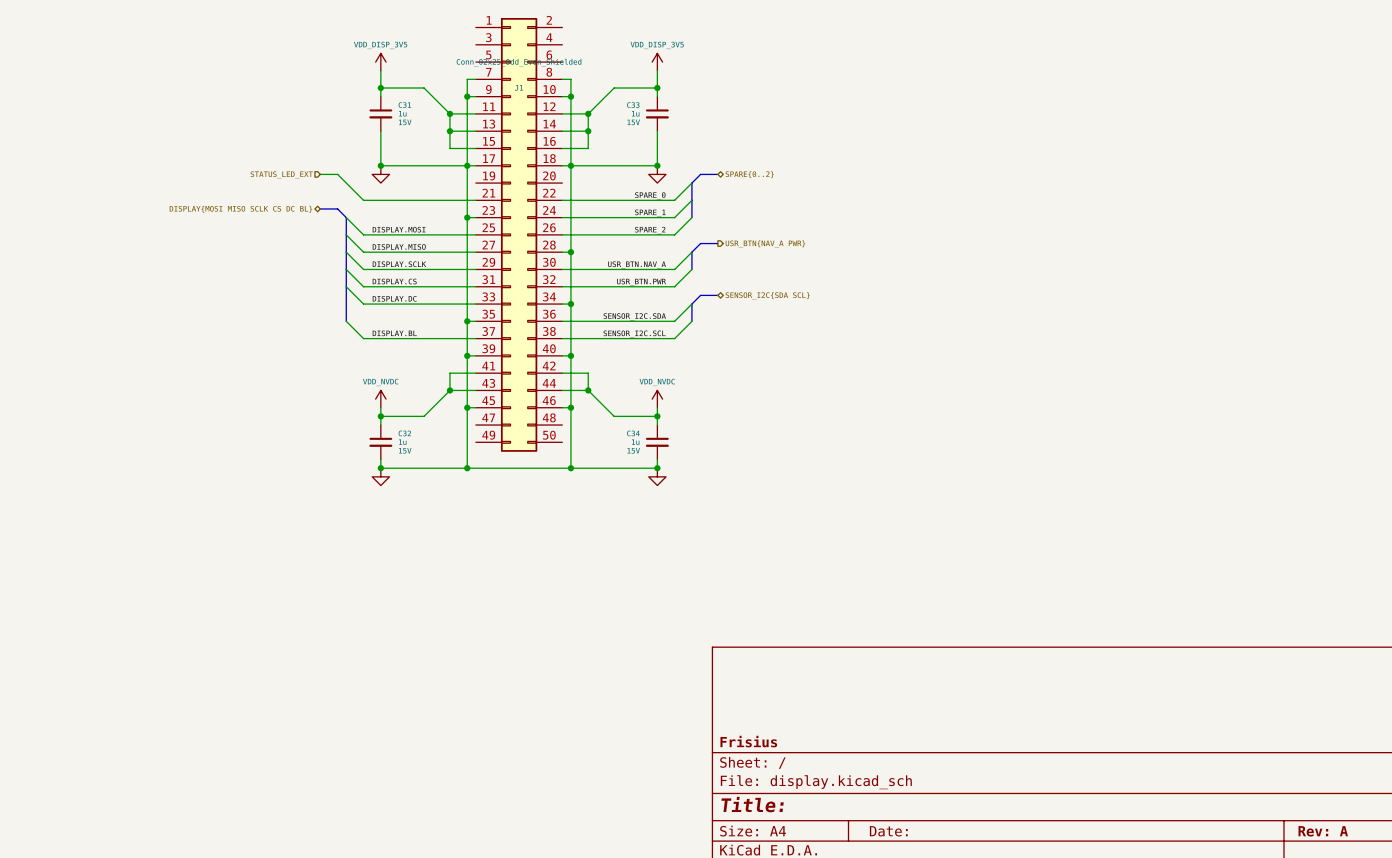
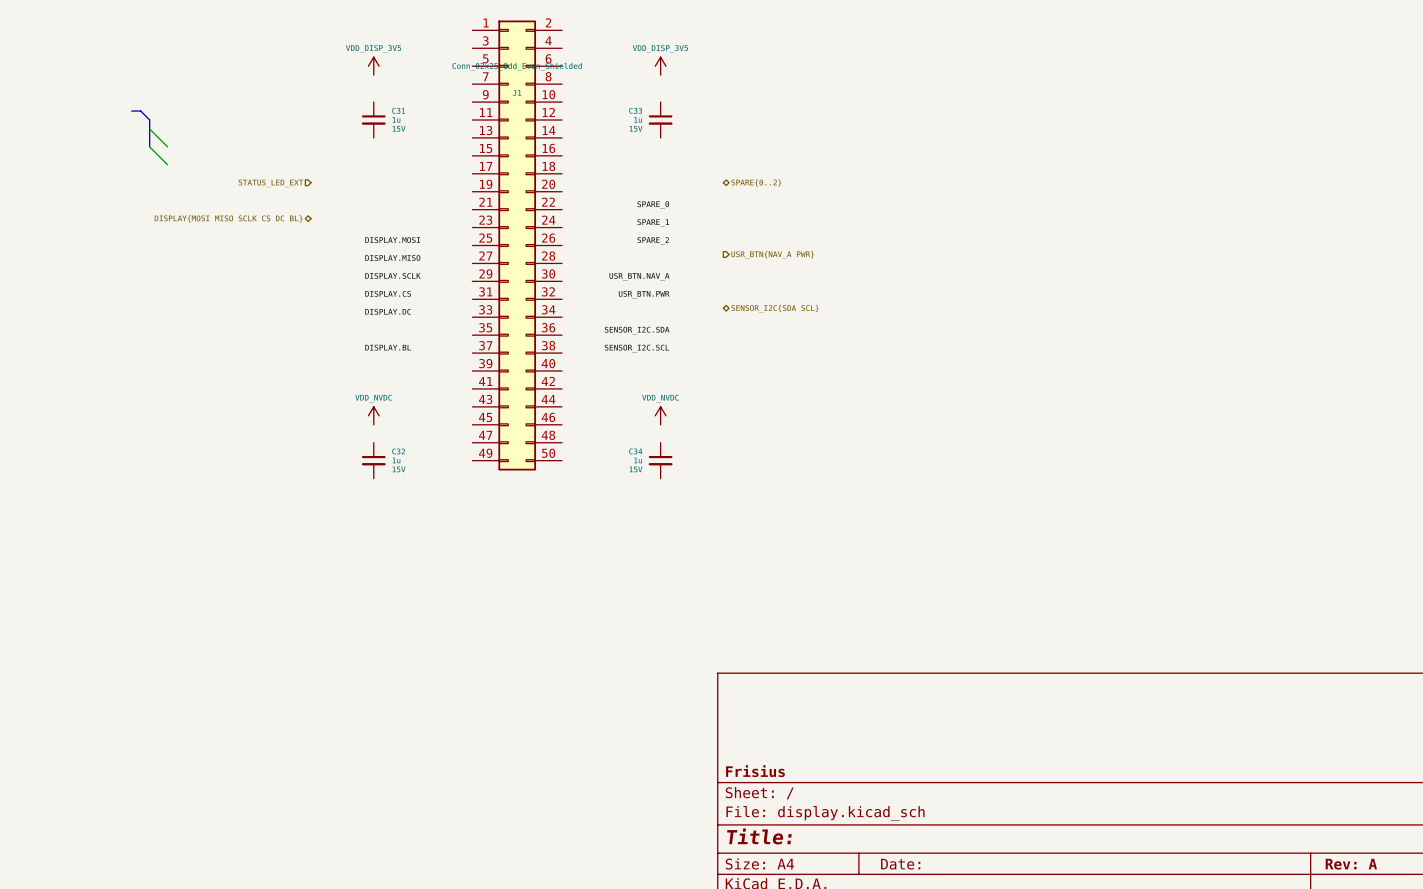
wire: (380, 70) (380, 96) -> none
wire: (657, 70) (657, 96) -> none
wire: (475, 79) (467, 79) (467, 468) -> none
wire: (562, 79) (570, 79) (570, 468) -> none
wire: (380, 88) (424, 88) (449, 113) -> none
junction: (380, 88) -> none
wire: (657, 88) (614, 88) (588, 113) -> none
junction: (657, 88) -> none
wire: (467, 96) (475, 96) -> none
junction: (467, 96) -> none
wire: (562, 96) (570, 96) -> none
junction: (570, 96) -> none
bus: none -> (131, 111) (140, 111) (149, 120) (149, 146)
wire: (449, 113) (449, 148) (475, 148) -> none
wire: (449, 113) (475, 113) -> none
junction: (449, 113) -> none
wire: (562, 113) (588, 113) -> none
wire: (588, 113) (588, 148) (562, 148) -> none
junction: (588, 113) -> none
wire: none -> (149, 128) (167, 146)
wire: (380, 131) (380, 165) (475, 165) -> none
wire: (449, 131) (475, 131) -> none
junction: (449, 131) -> none
wire: (562, 131) (588, 131) -> none
junction: (588, 131) -> none
wire: (657, 131) (657, 165) (562, 165) -> none
wire: none -> (149, 146) (167, 164)
junction: (380, 165) -> none
junction: (467, 165) -> none
junction: (570, 165) -> none
junction: (657, 165) -> none
wire: (320, 174) (337, 174) (363, 200) (475, 200) -> none
power symbol: (380, 174) -> none
power symbol: (657, 174) -> none
bus: (717, 174) (700, 174) (691, 183) (691, 217) -> none
wire: (691, 183) (674, 200) (562, 200) -> none
wire: (691, 200) (674, 217) (562, 217) -> none
bus: (320, 208) (337, 208) (346, 217) (346, 321) -> none
wire: (346, 217) (363, 234) (475, 234) -> none
wire: (467, 217) (475, 217) -> none
junction: (467, 217) -> none
wire: (691, 217) (674, 234) (562, 234) -> none
wire: (346, 234) (363, 252) (475, 252) -> none
bus: (717, 243) (700, 243) (691, 252) (691, 269) -> none
wire: (346, 252) (363, 269) (475, 269) -> none
wire: (562, 252) (570, 252) -> none
junction: (570, 252) -> none
wire: (691, 252) (674, 269) (562, 269) -> none
wire: (346, 269) (363, 286) (475, 286) -> none
wire: (691, 269) (674, 286) (562, 286) -> none
wire: (346, 286) (363, 304) (475, 304) -> none
bus: (717, 295) (700, 295) (691, 304) (691, 321) -> none
wire: (562, 304) (570, 304) -> none
junction: (570, 304) -> none
wire: (691, 304) (674, 321) (562, 321) -> none
wire: (346, 321) (363, 338) (475, 338) -> none
wire: (467, 321) (475, 321) -> none
junction: (467, 321) -> none
wire: (691, 321) (674, 338) (562, 338) -> none
wire: (467, 355) (475, 355) -> none
junction: (467, 355) -> none
wire: (562, 355) (570, 355) -> none
junction: (570, 355) -> none
wire: (475, 373) (449, 373) (449, 390) -> none
wire: (562, 373) (588, 373) (588, 390) -> none
wire: (449, 390) (424, 416) (380, 416) -> none
wire: (449, 390) (475, 390) -> none
junction: (449, 390) -> none
wire: (562, 390) (588, 390) -> none
wire: (588, 390) (614, 416) (657, 416) -> none
junction: (588, 390) -> none
wire: (380, 407) (380, 425) -> none
wire: (467, 407) (475, 407) -> none
junction: (467, 407) -> none
wire: (562, 407) (570, 407) -> none
junction: (570, 407) -> none
wire: (657, 407) (657, 425) -> none
junction: (380, 416) -> none
junction: (657, 416) -> none
wire: (380, 459) (380, 468) (657, 468) (657, 459) -> none
junction: (380, 468) -> none
junction: (467, 468) -> none
junction: (570, 468) -> none
junction: (657, 468) -> none
power symbol: (380, 476) -> none
power symbol: (657, 476) -> none

